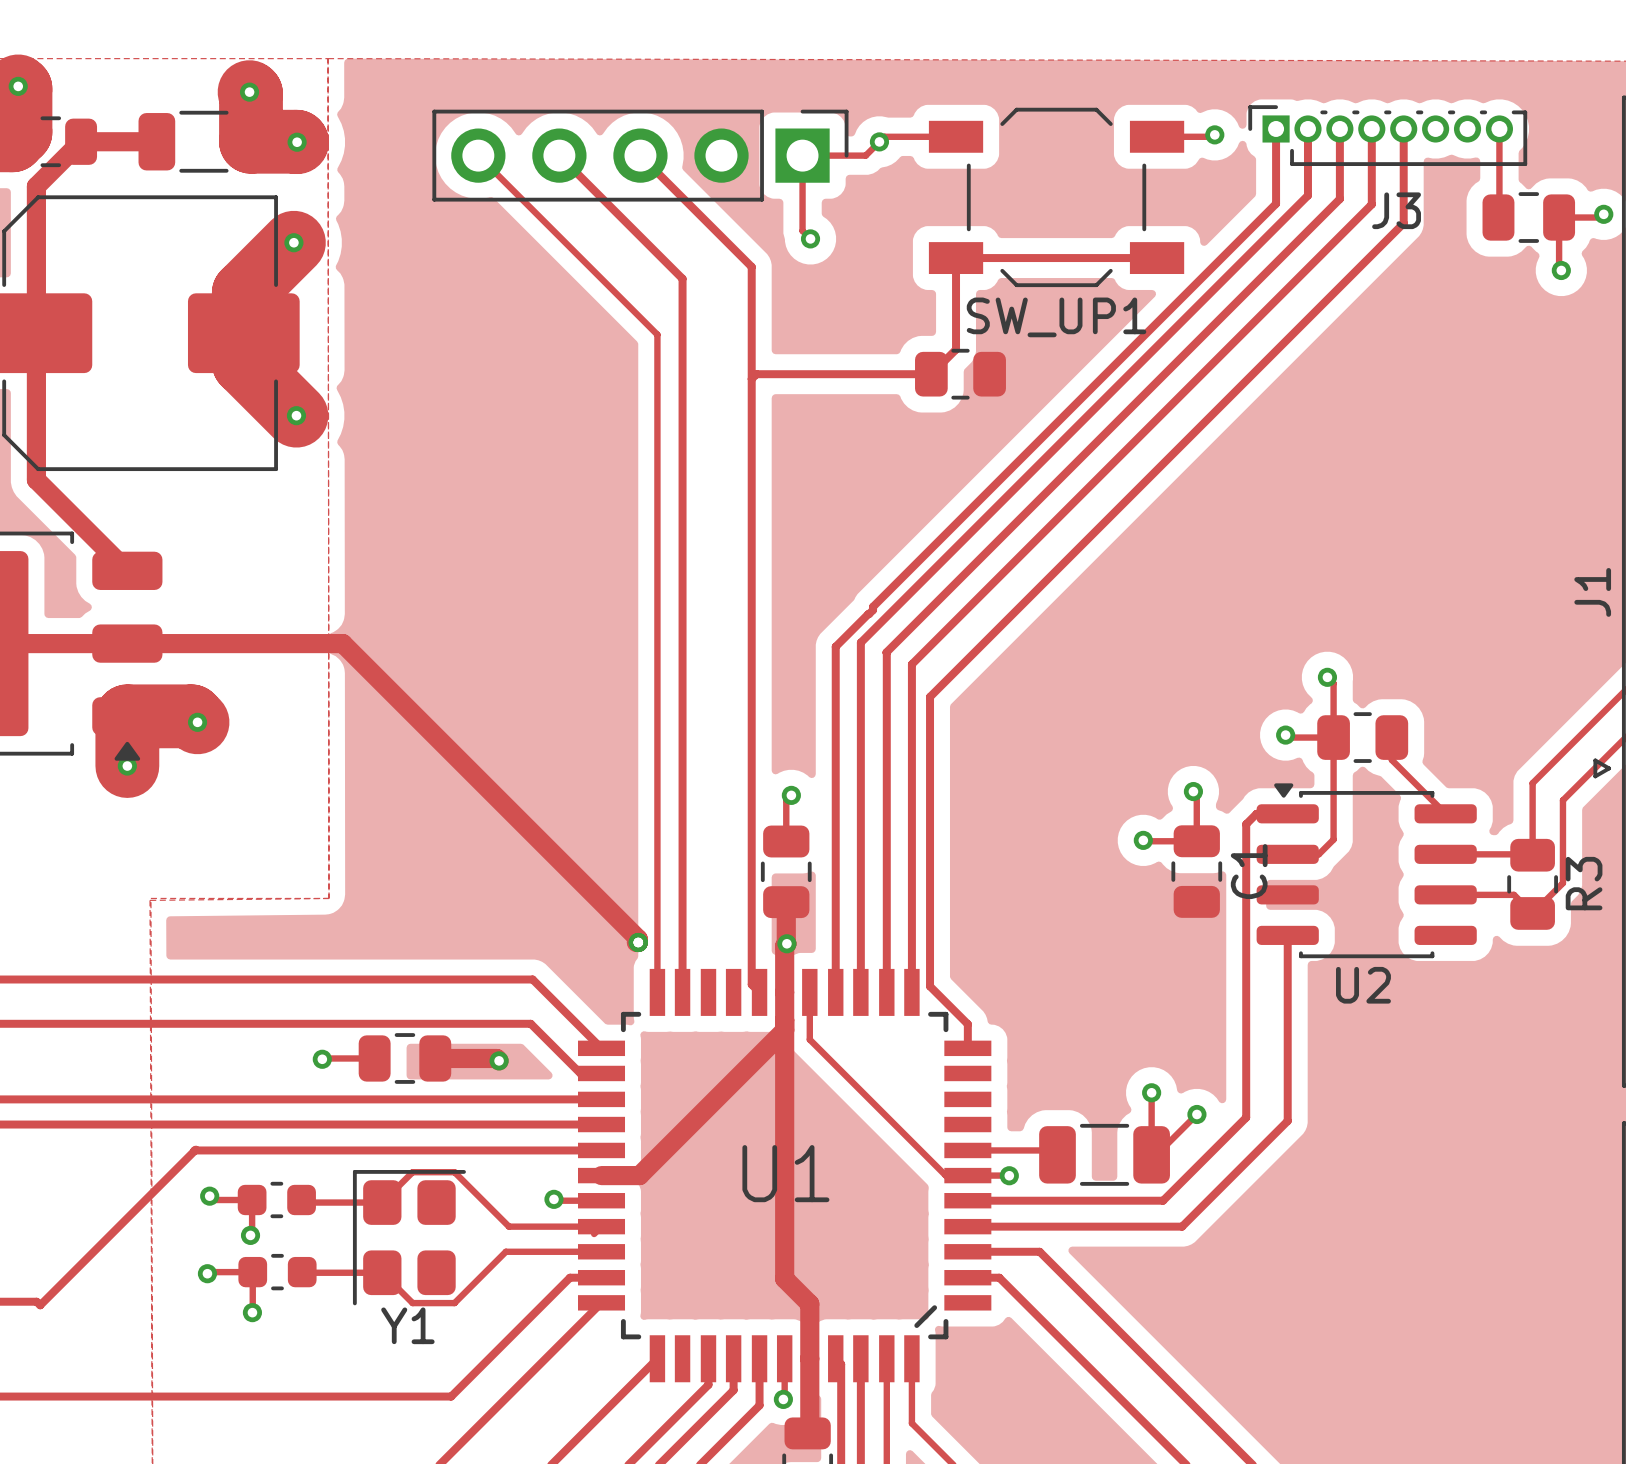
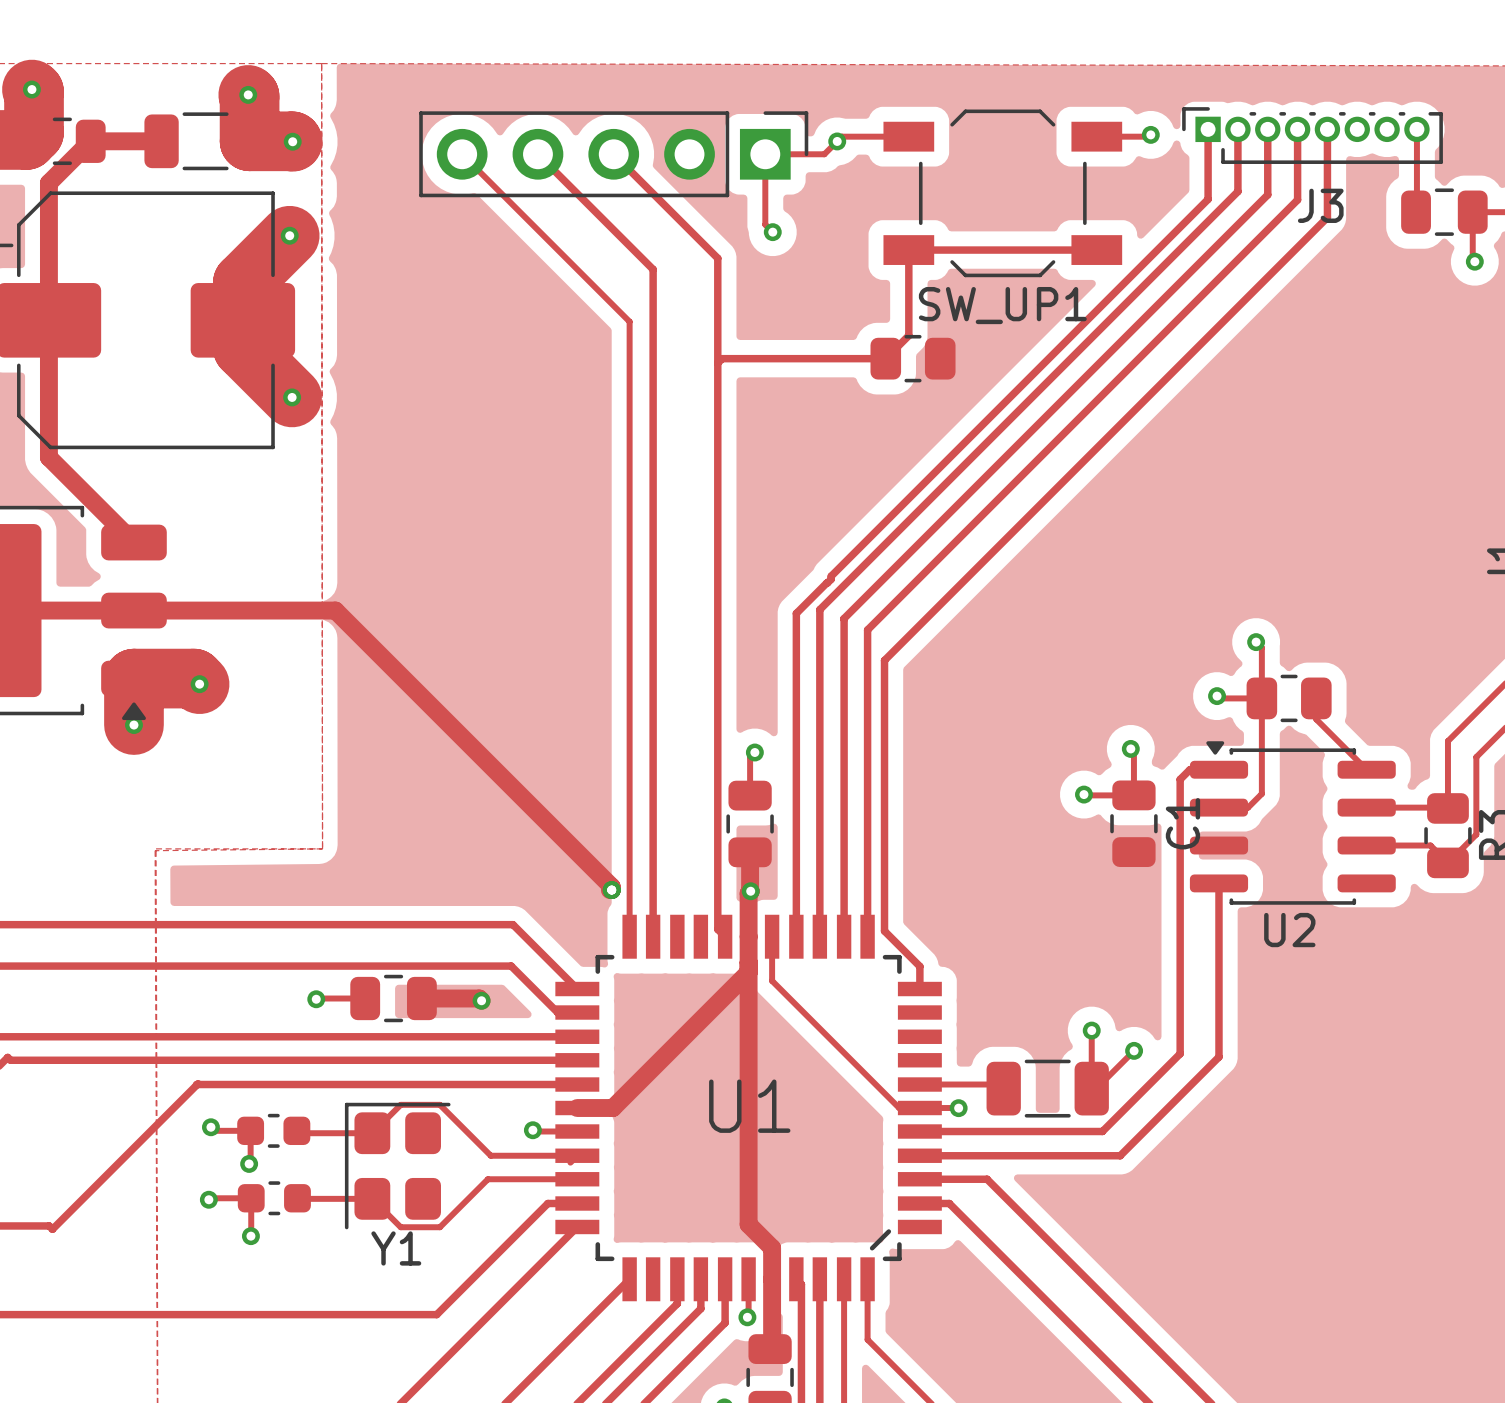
track: (784, 1278) (809, 1303) (809, 1325) -> (748, 1204) (748, 1224) (772, 1248)

